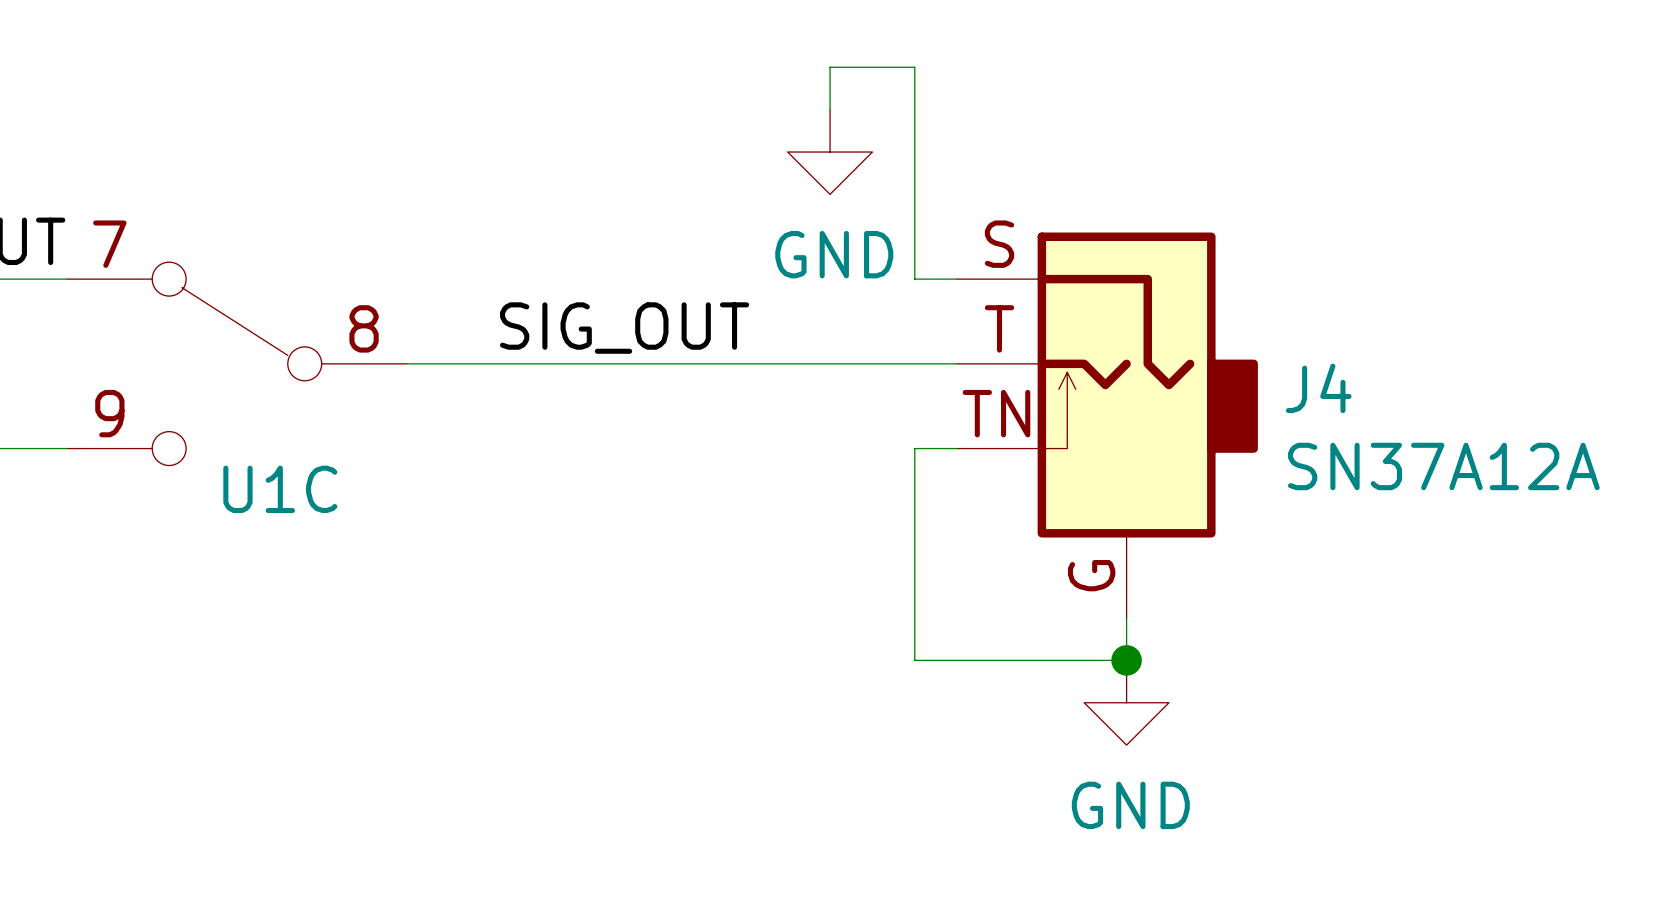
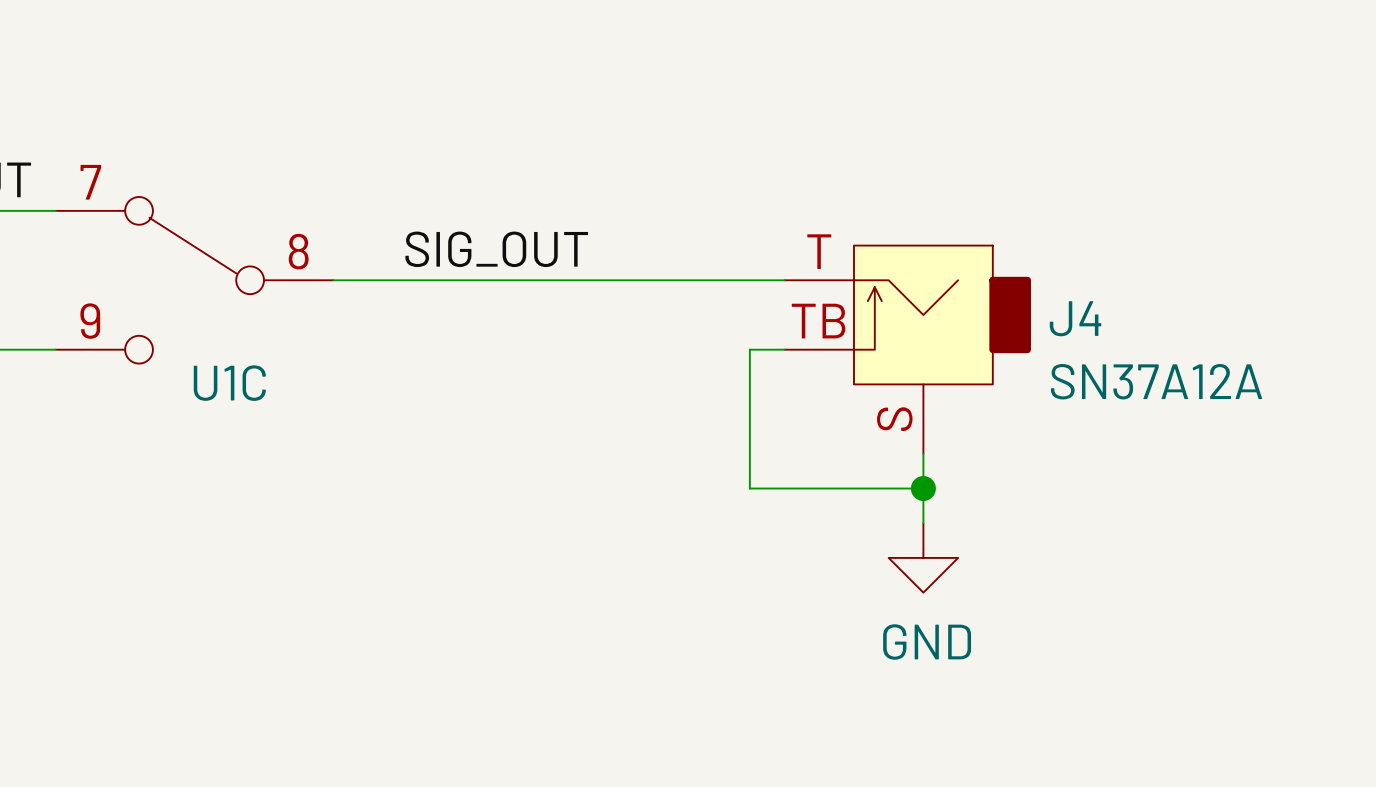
wire: (830, 109) (830, 67) (914, 67) (914, 279) (957, 279) -> none
power symbol: GND (830, 152) -> none
J4 symbol: [957, 232, 1258, 619] -> [784, 245, 1031, 454]
wire: (914, 618) (914, 660) (1126, 660) -> (749, 488) (923, 488) (923, 453)
junction position: (1126, 660) -> (923, 488)

